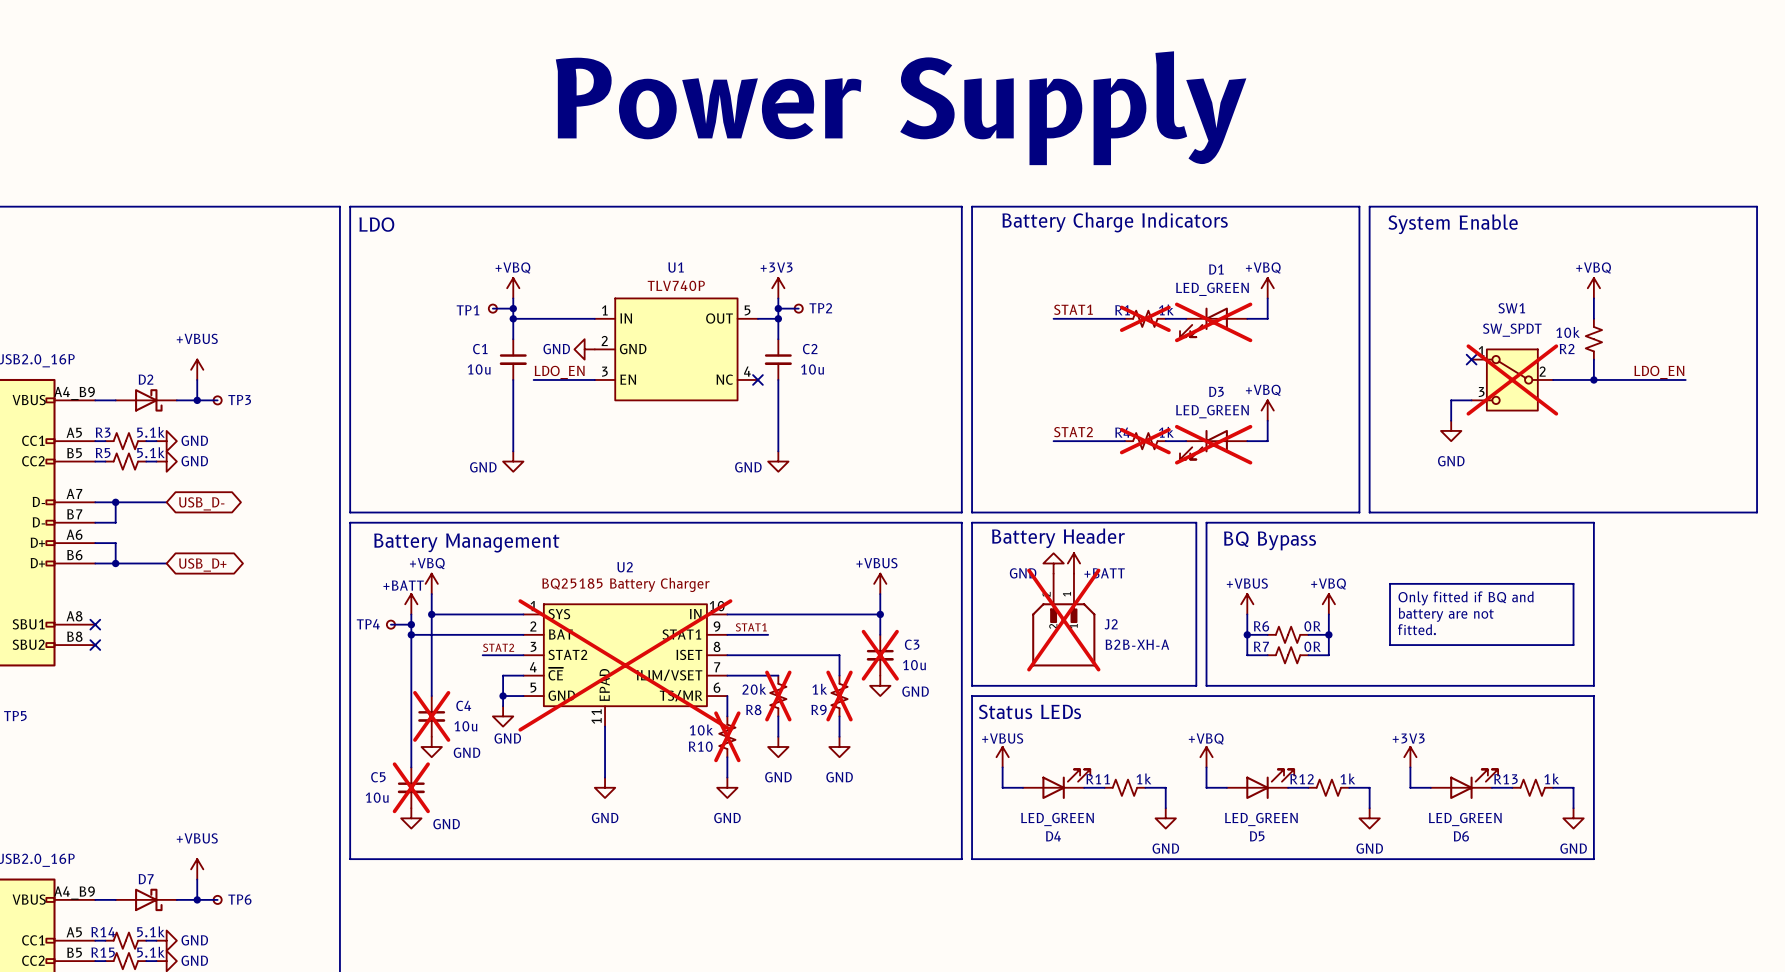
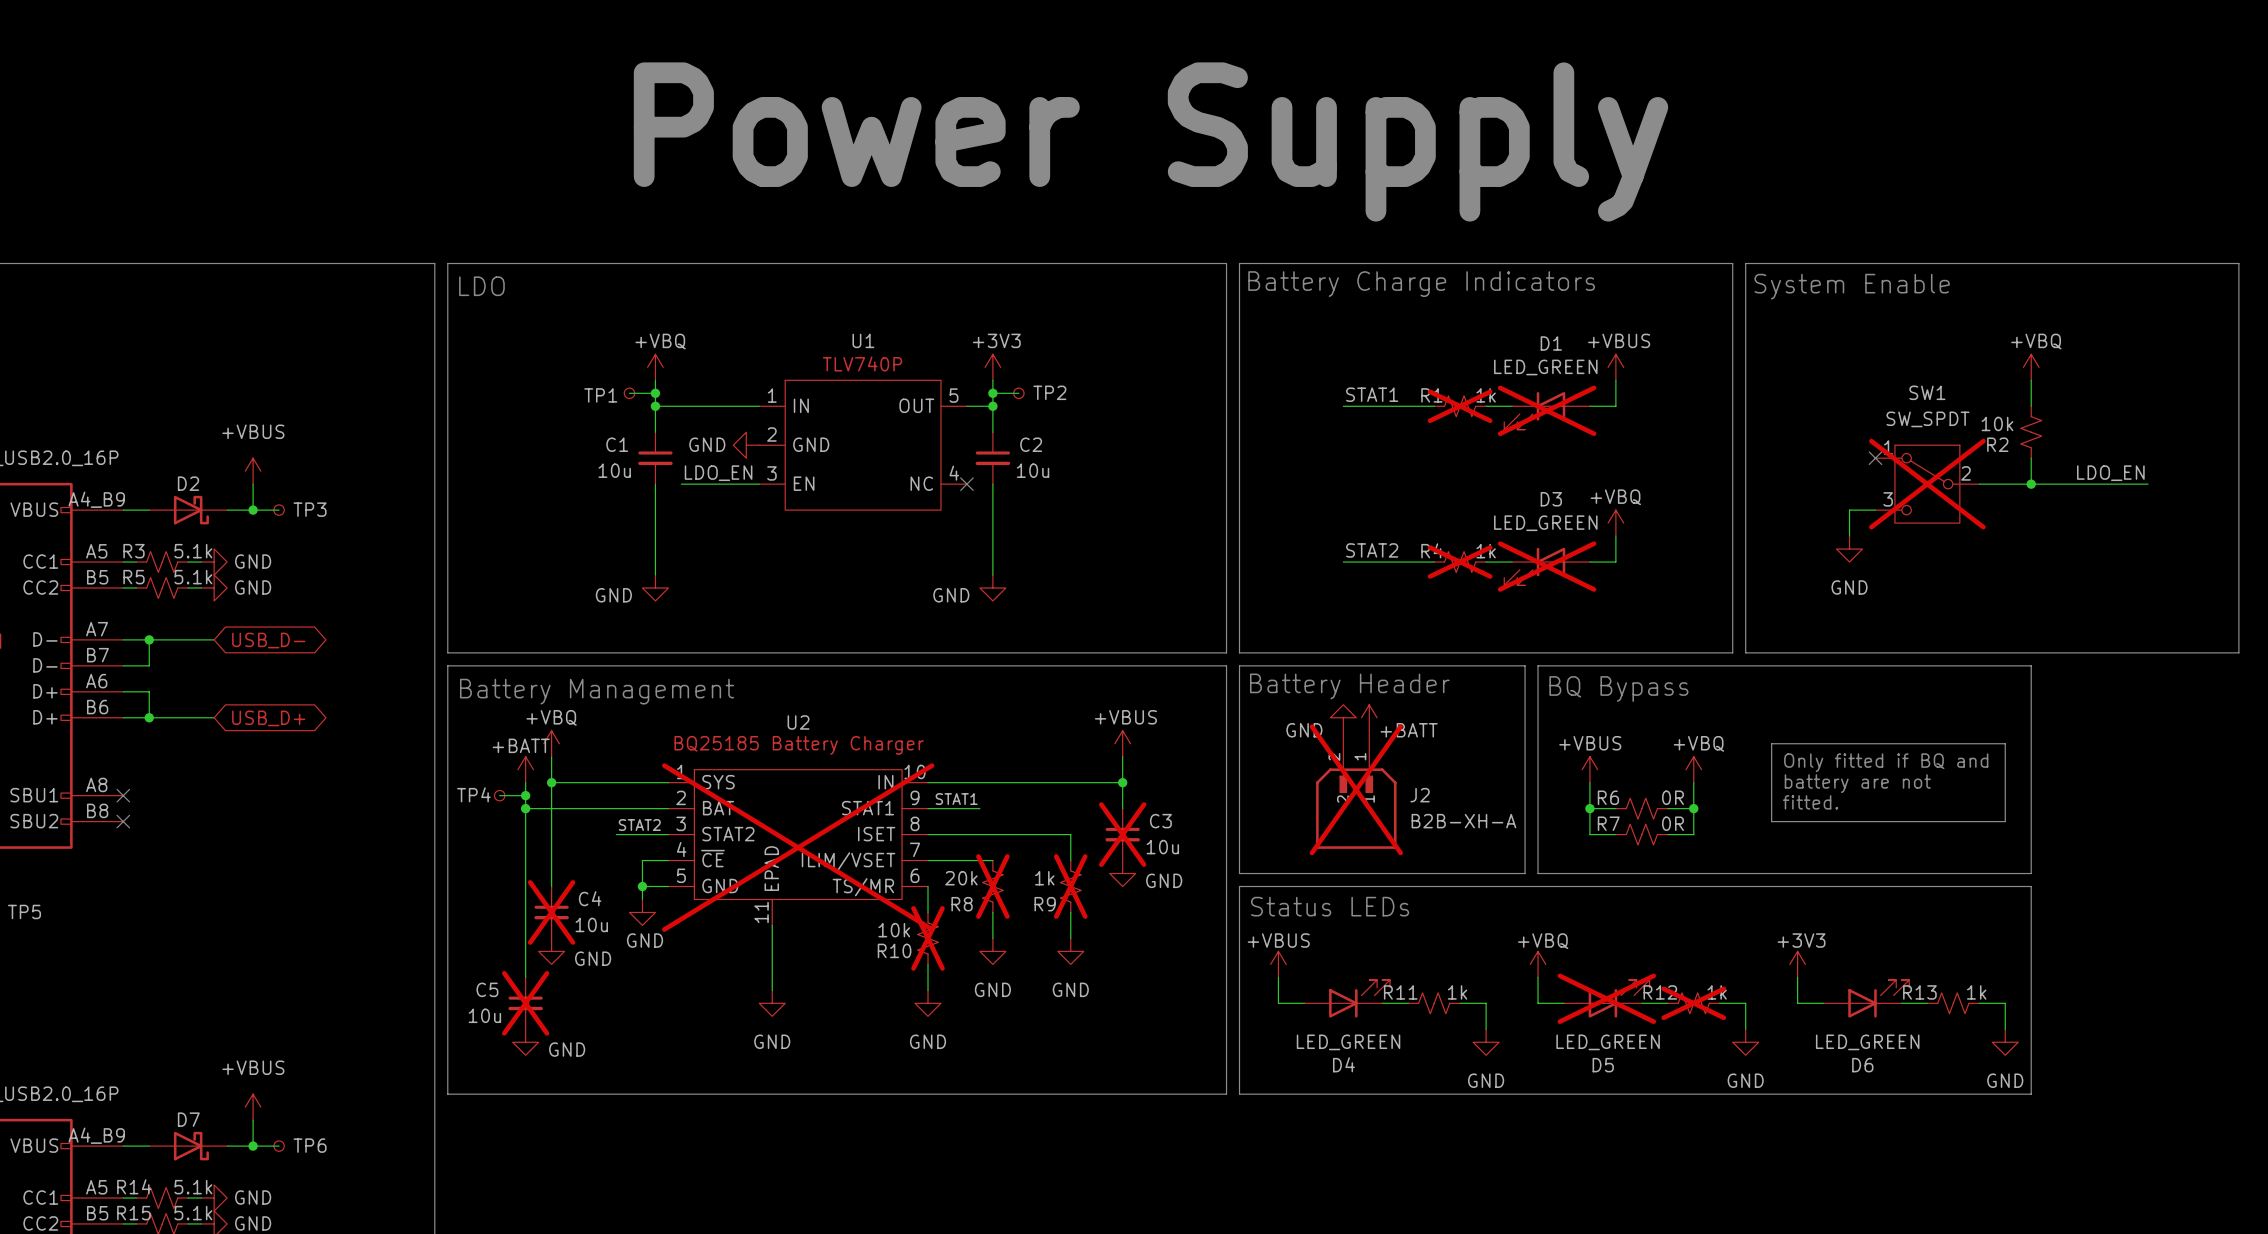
power symbol: +VBQ (1267, 288) -> +VBUS (1615, 367)
D5 do-not-place cross: none -> (1606, 998)
R12 do-not-place cross: none -> (1693, 1003)

